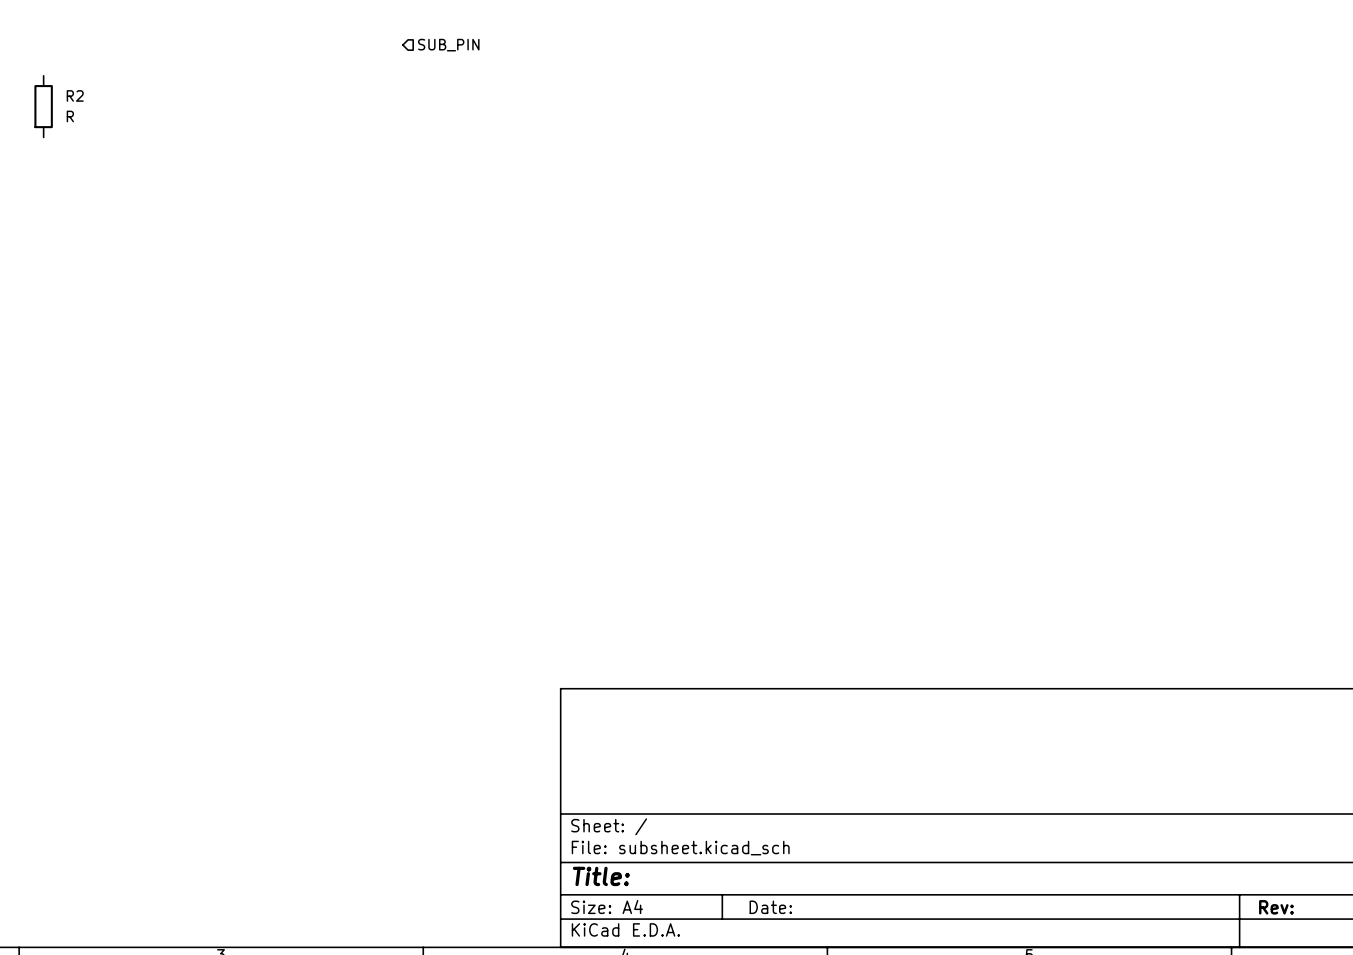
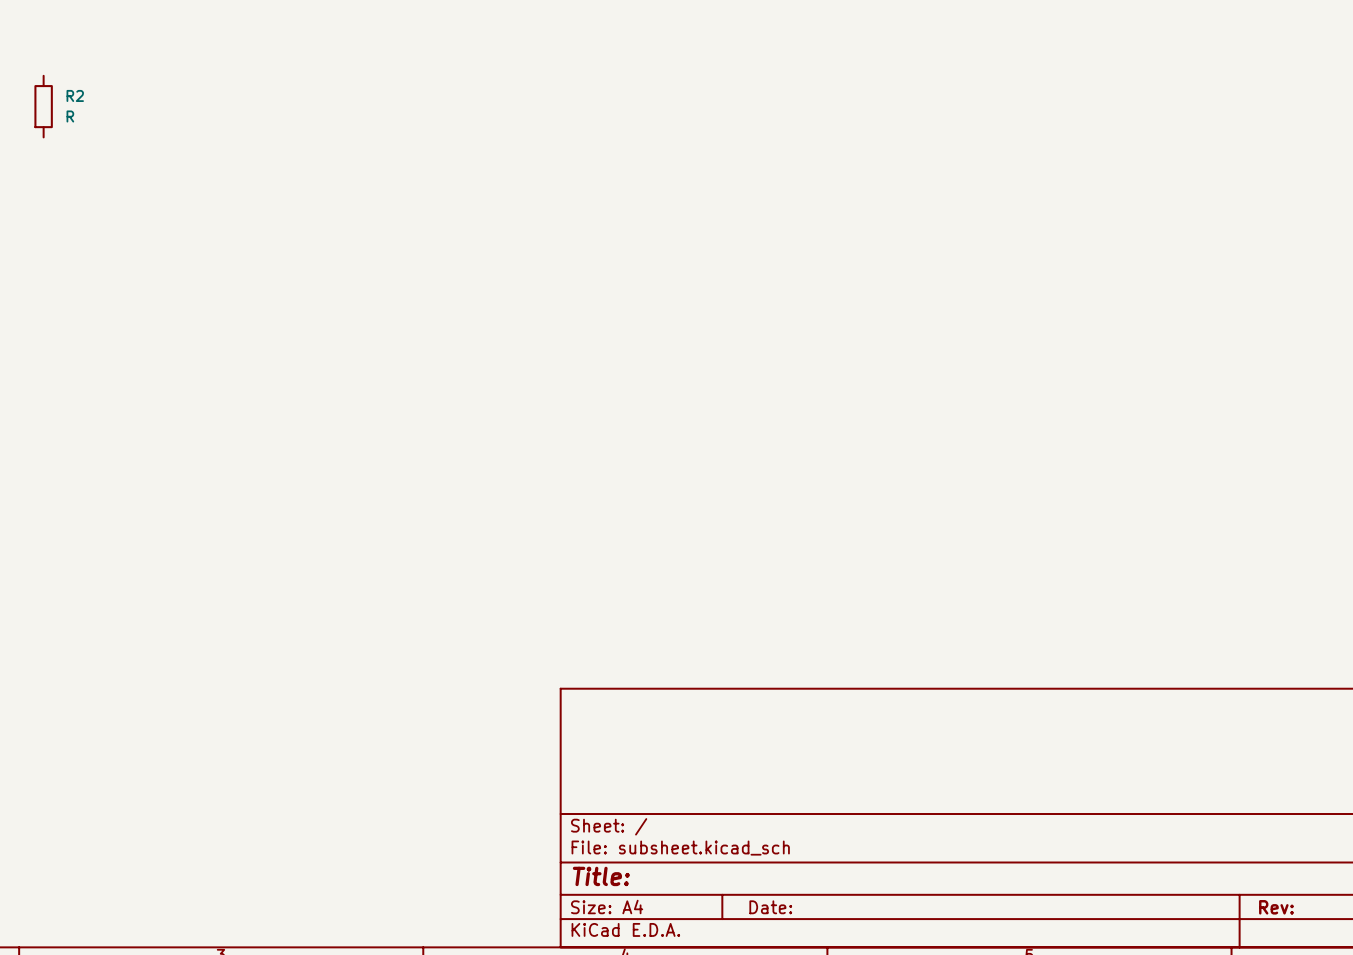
hierarchical label: SUB_PIN (448, 45) -> none

